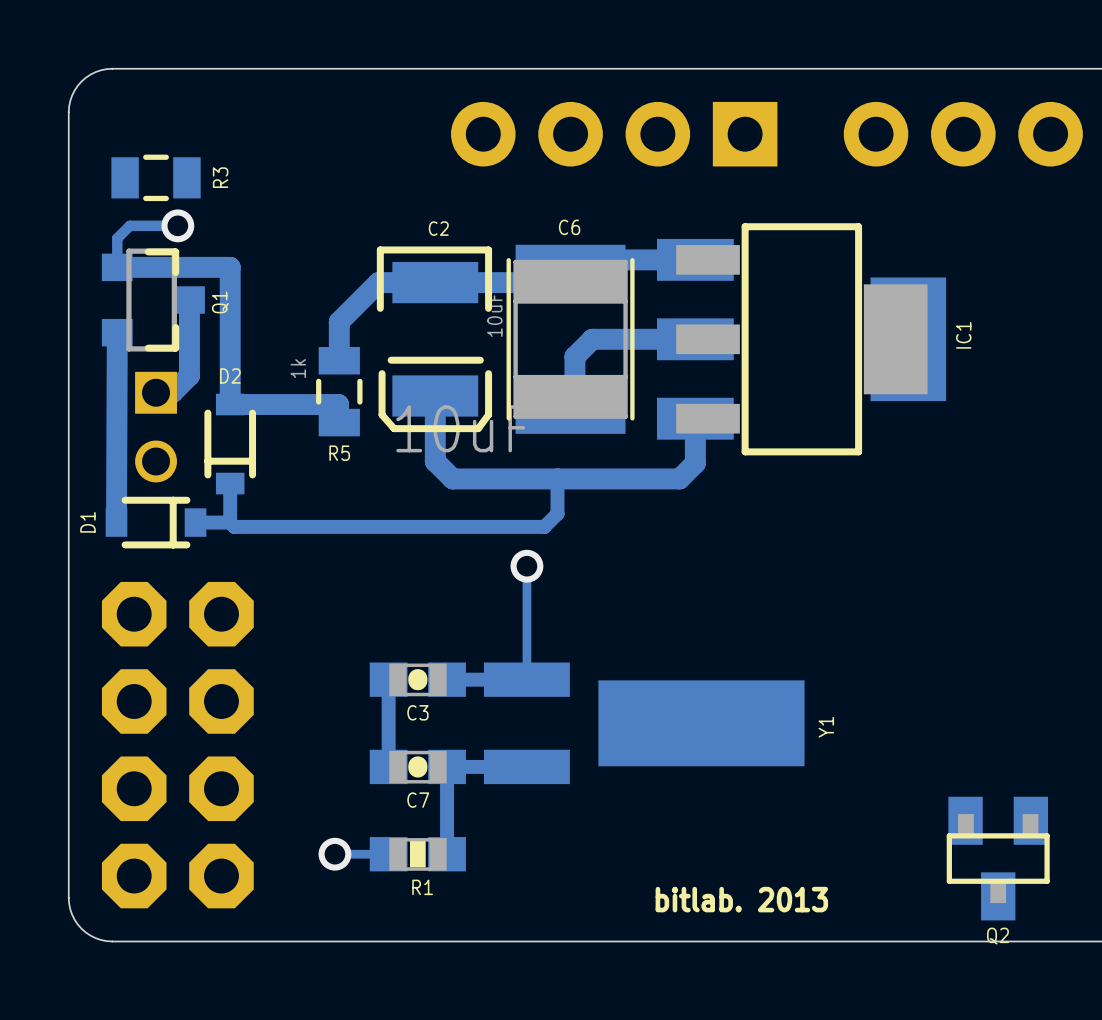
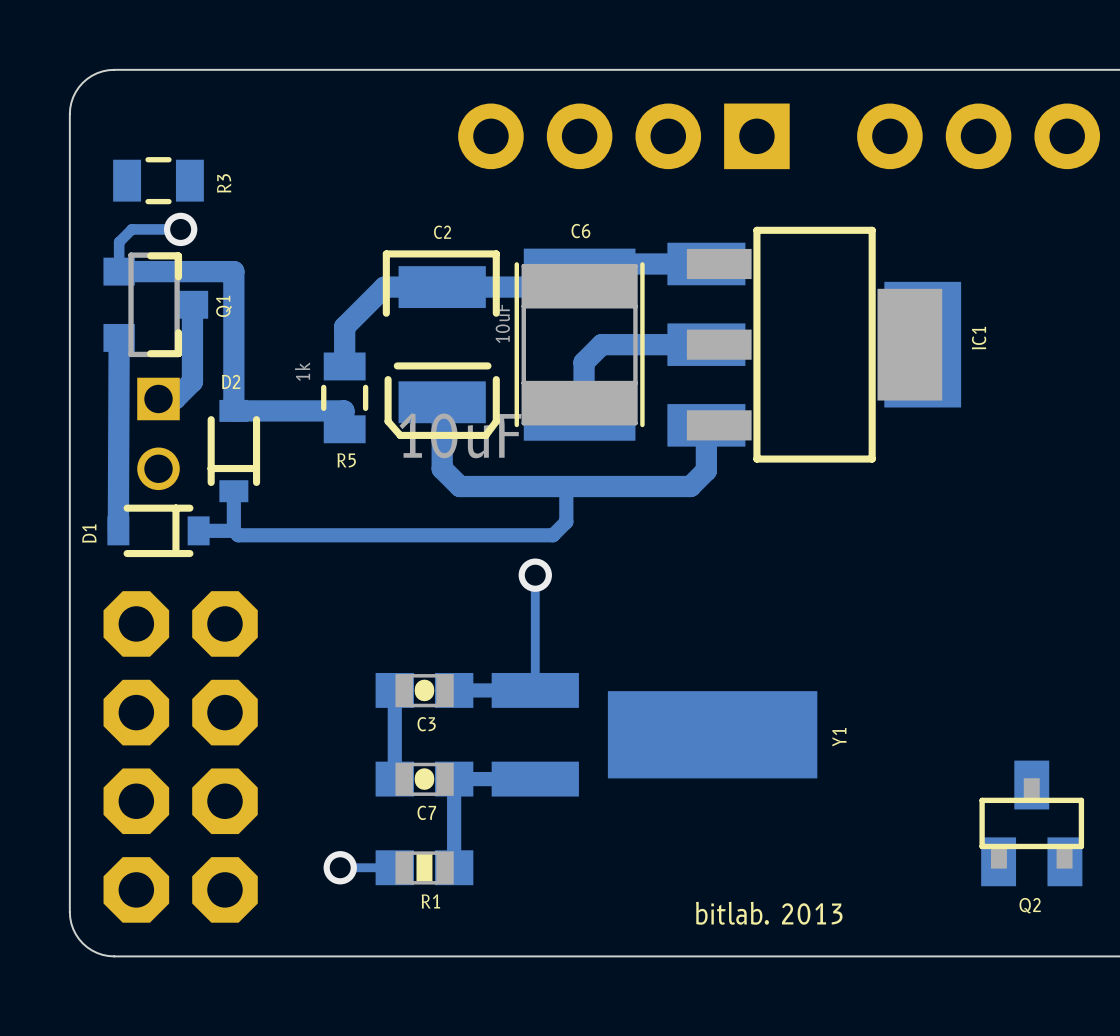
Q2 rotation: 0° (998, 858) -> 180° (1031, 823)

